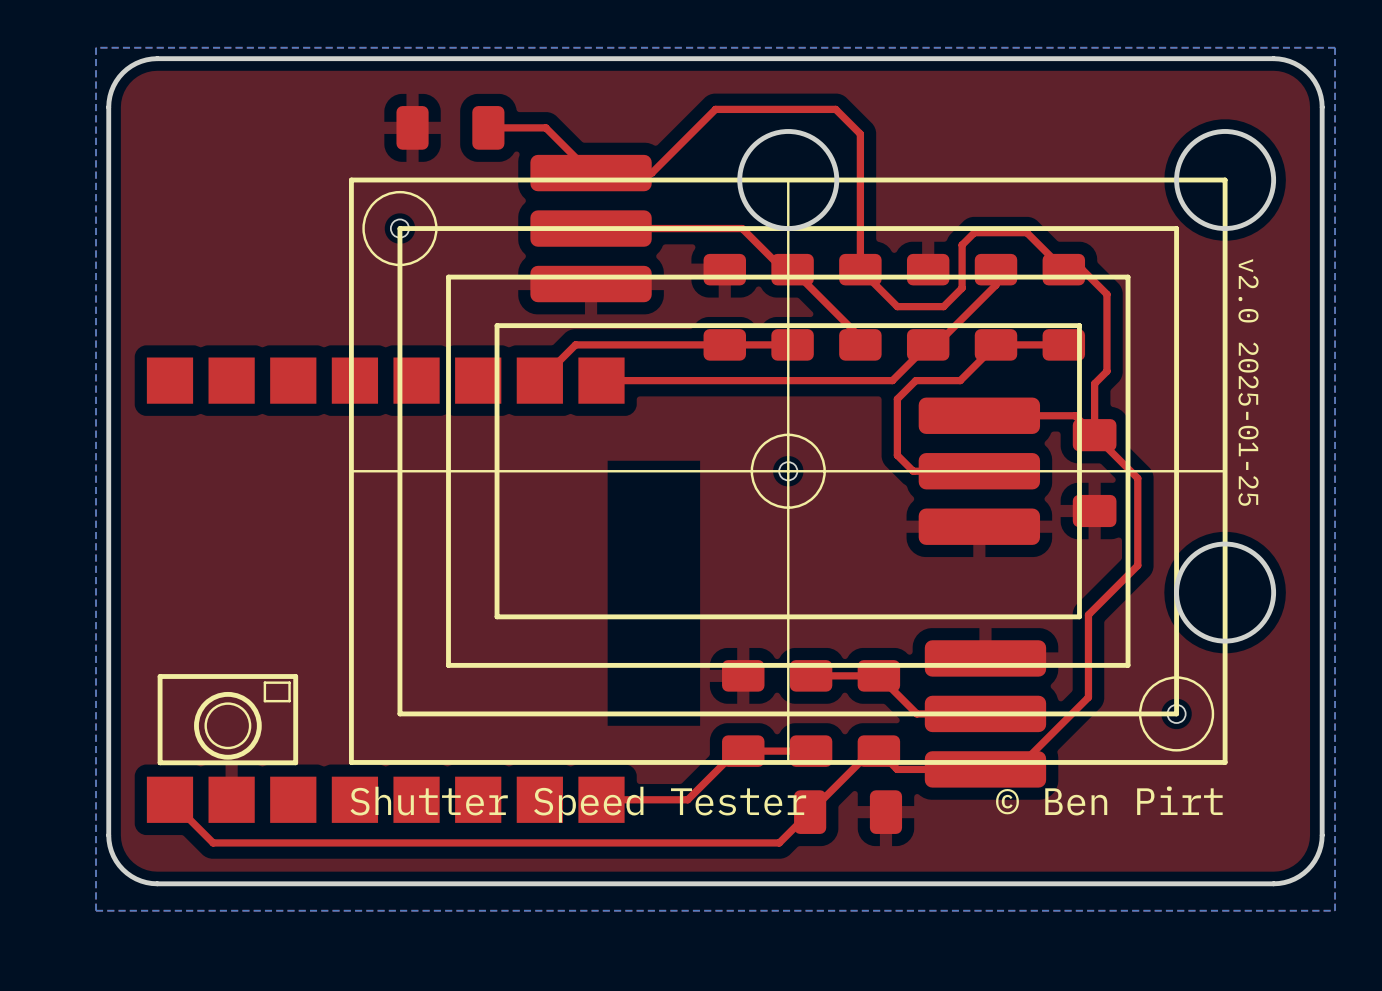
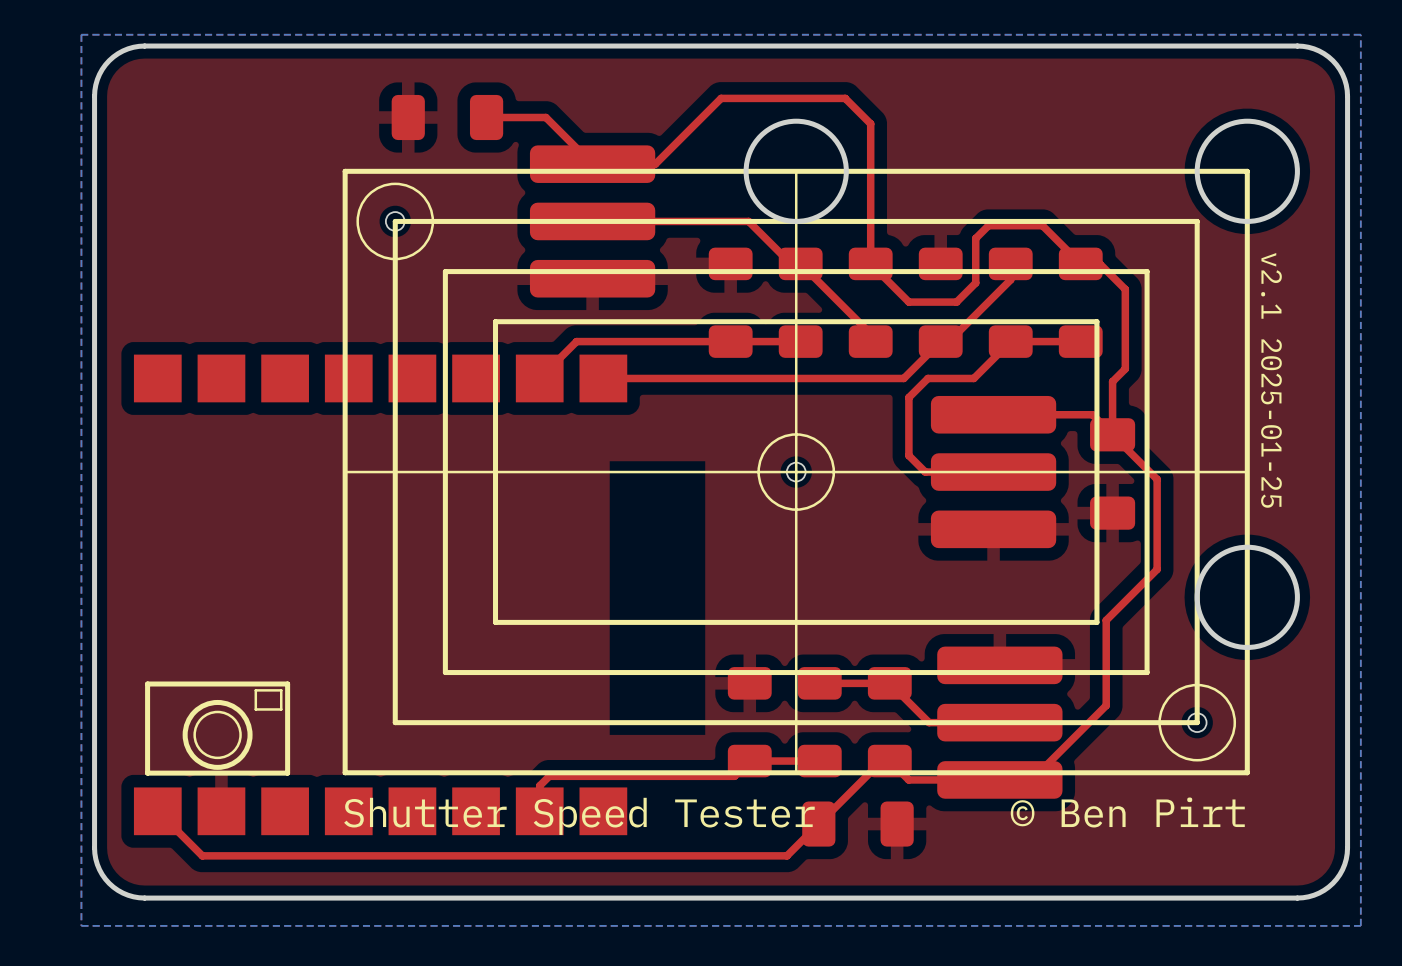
text: v2.0 2025-01-25 (1248, 382) -> v2.1 2025-01-25 (1271, 380)
top track: (743, 751) (736, 751) (687, 799) (601, 799) -> (749, 761) (734, 776) (549, 776) (539, 785) (539, 811)

